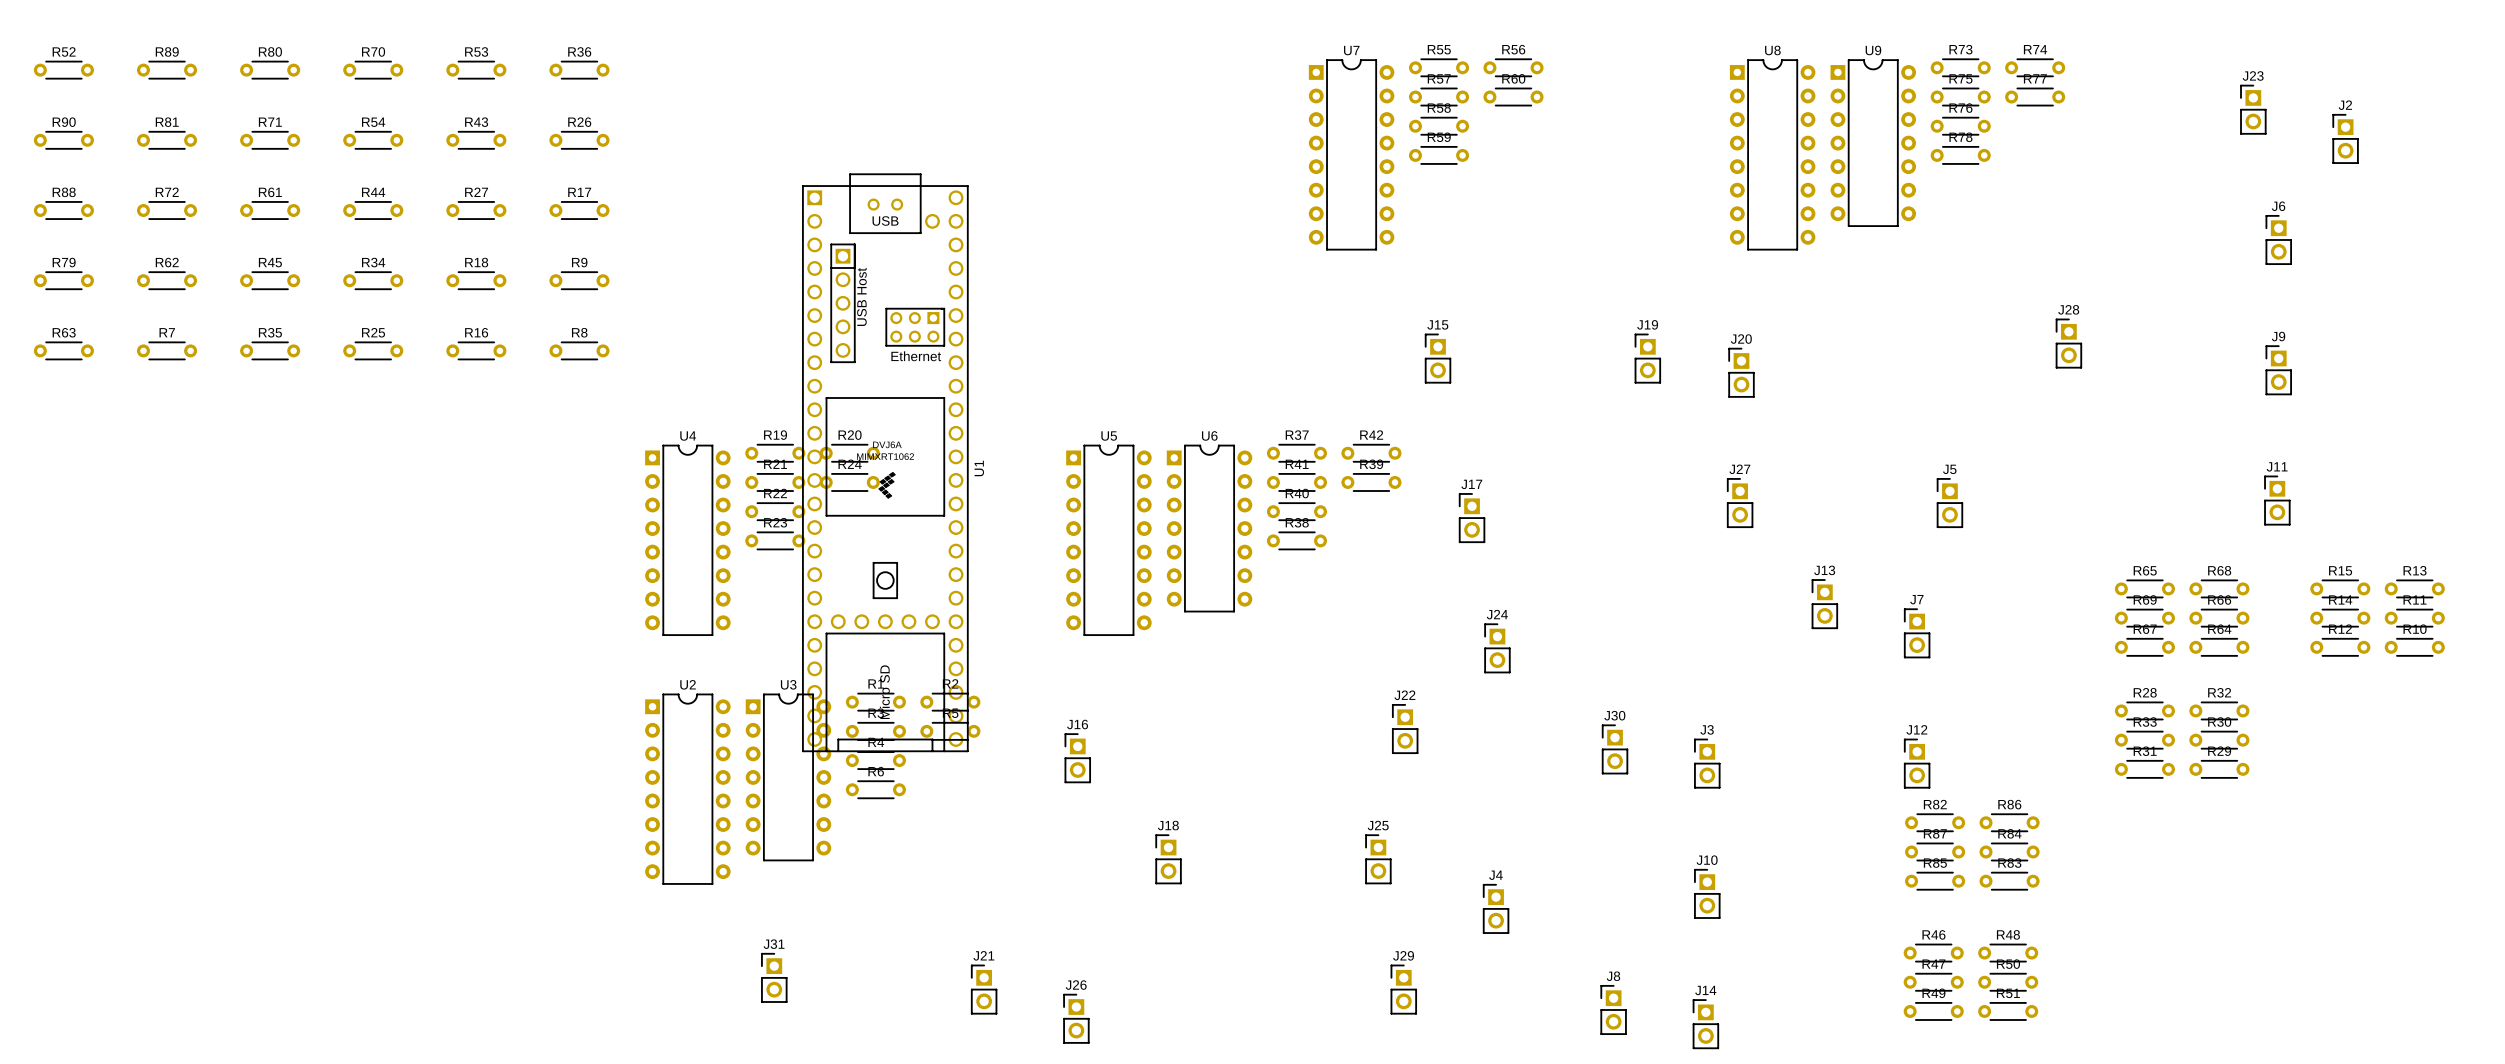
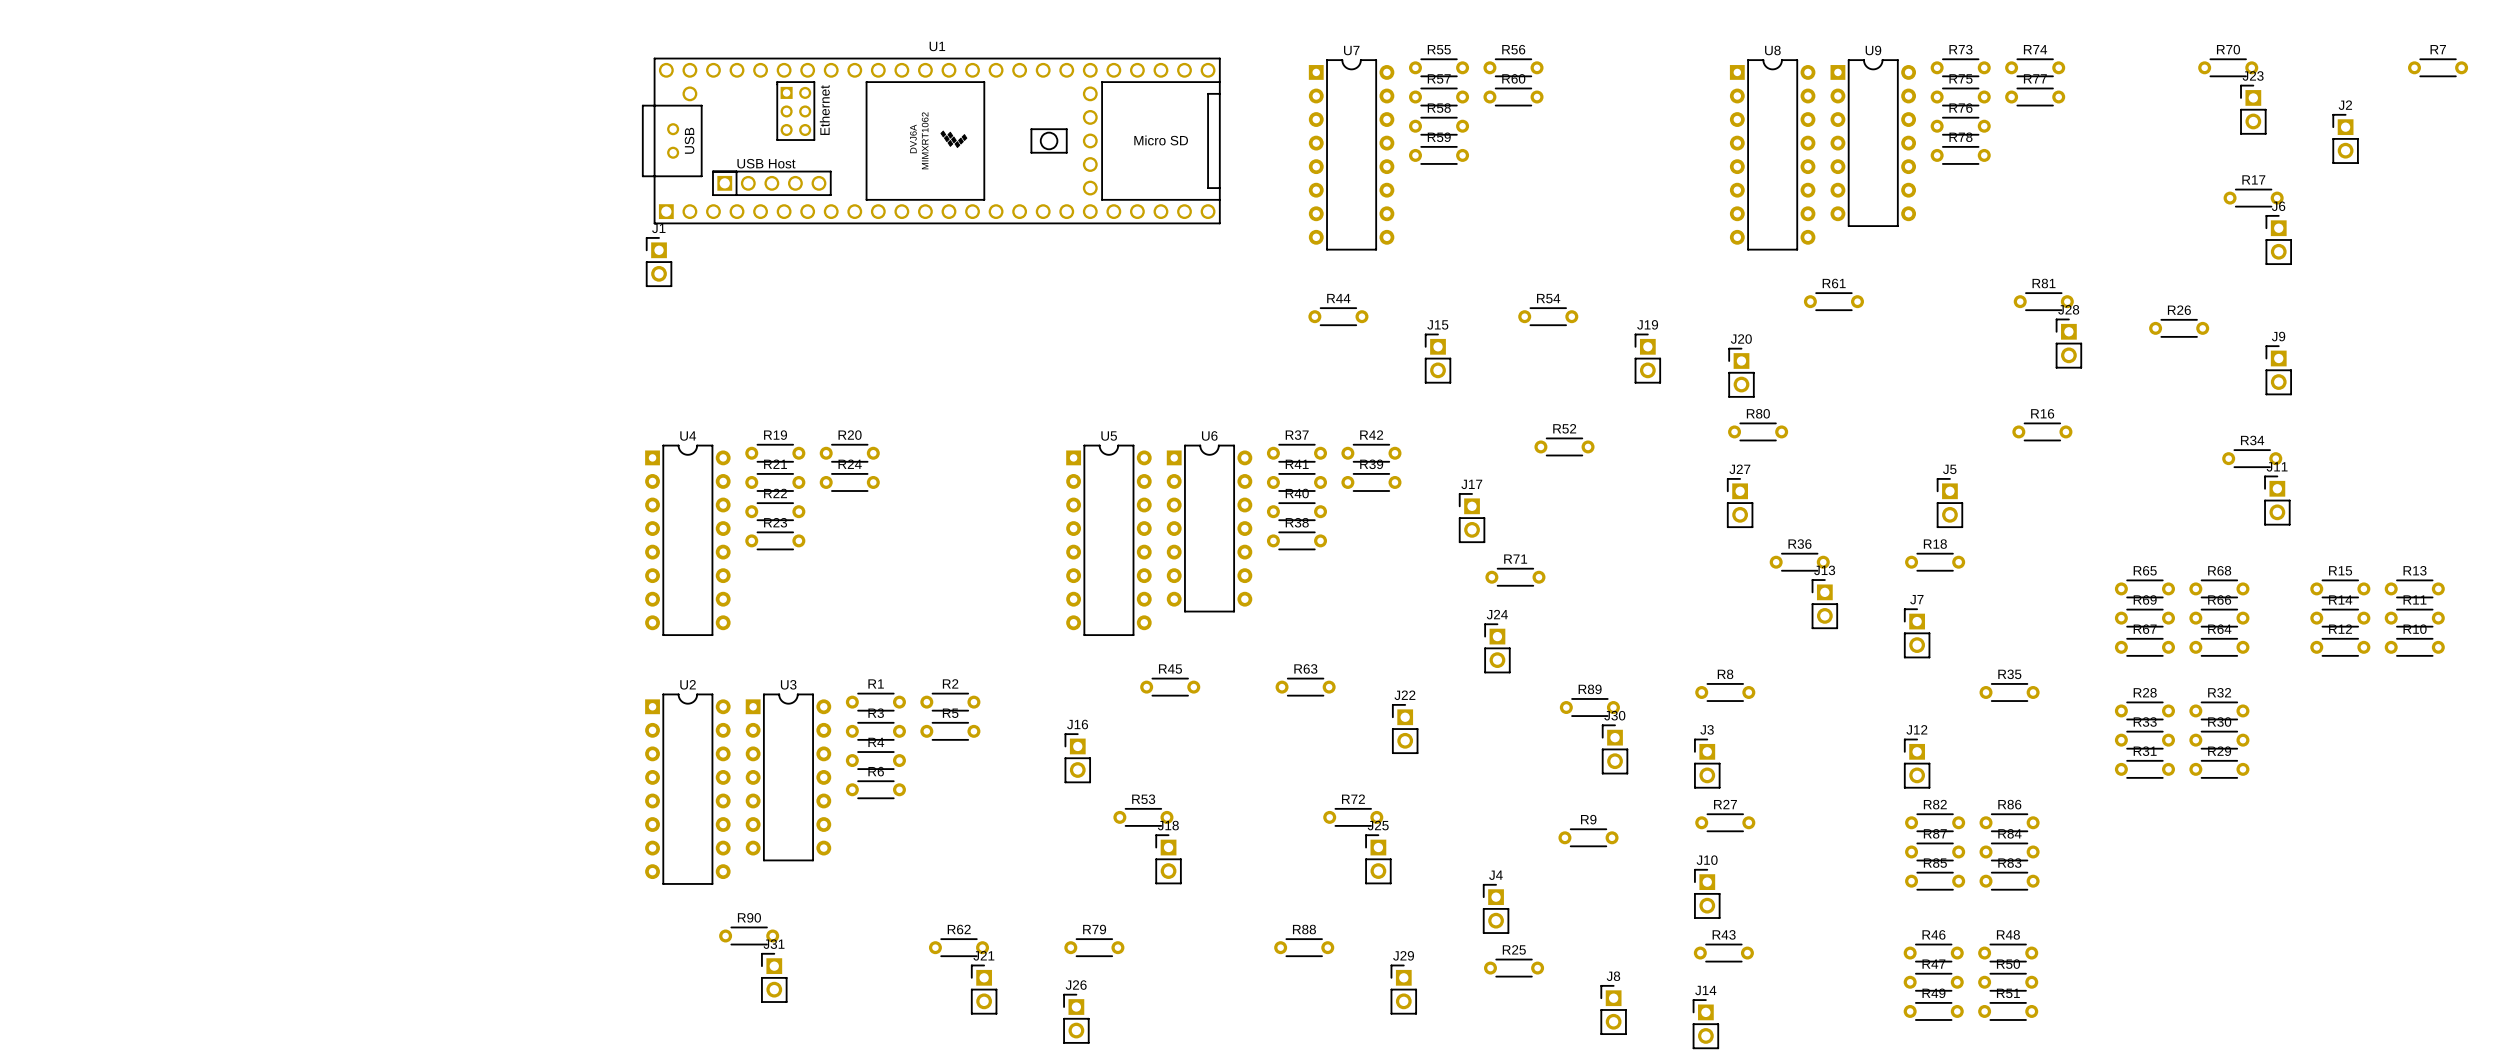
R52 position: (63, 70) -> (1564, 446)
R89 position: (167, 70) -> (1589, 707)
R80 position: (270, 70) -> (1758, 431)
R70 position: (373, 70) -> (2228, 67)
R53 position: (476, 70) -> (1143, 817)
R36 position: (579, 70) -> (1799, 562)
R90 position: (63, 140) -> (749, 935)
R81 position: (167, 140) -> (2043, 301)
R71 position: (270, 140) -> (1515, 577)
R54 position: (373, 140) -> (1548, 316)
R43 position: (476, 140) -> (1723, 953)
R26 position: (579, 140) -> (2179, 328)
R88 position: (63, 210) -> (1304, 947)
R72 position: (167, 210) -> (1353, 817)
R61 position: (270, 210) -> (1833, 301)
R44 position: (373, 210) -> (1338, 316)
R27 position: (476, 210) -> (1725, 822)
R17 position: (579, 210) -> (2253, 198)
J1: none -> (659, 262)
R79 position: (63, 280) -> (1094, 947)
R62 position: (167, 280) -> (958, 947)
R45 position: (270, 280) -> (1170, 687)
R34 position: (373, 280) -> (2252, 458)
R18 position: (476, 280) -> (1935, 562)
R9 position: (579, 280) -> (1588, 837)
R63 position: (63, 350) -> (1305, 687)
R7 position: (167, 350) -> (2438, 67)
R35 position: (270, 350) -> (2009, 692)
R25 position: (373, 350) -> (1514, 968)
R16 position: (476, 350) -> (2042, 431)
R8 position: (579, 350) -> (1725, 692)
U1 rotation: 0° (885, 462) -> 90° counterclockwise (931, 140)

